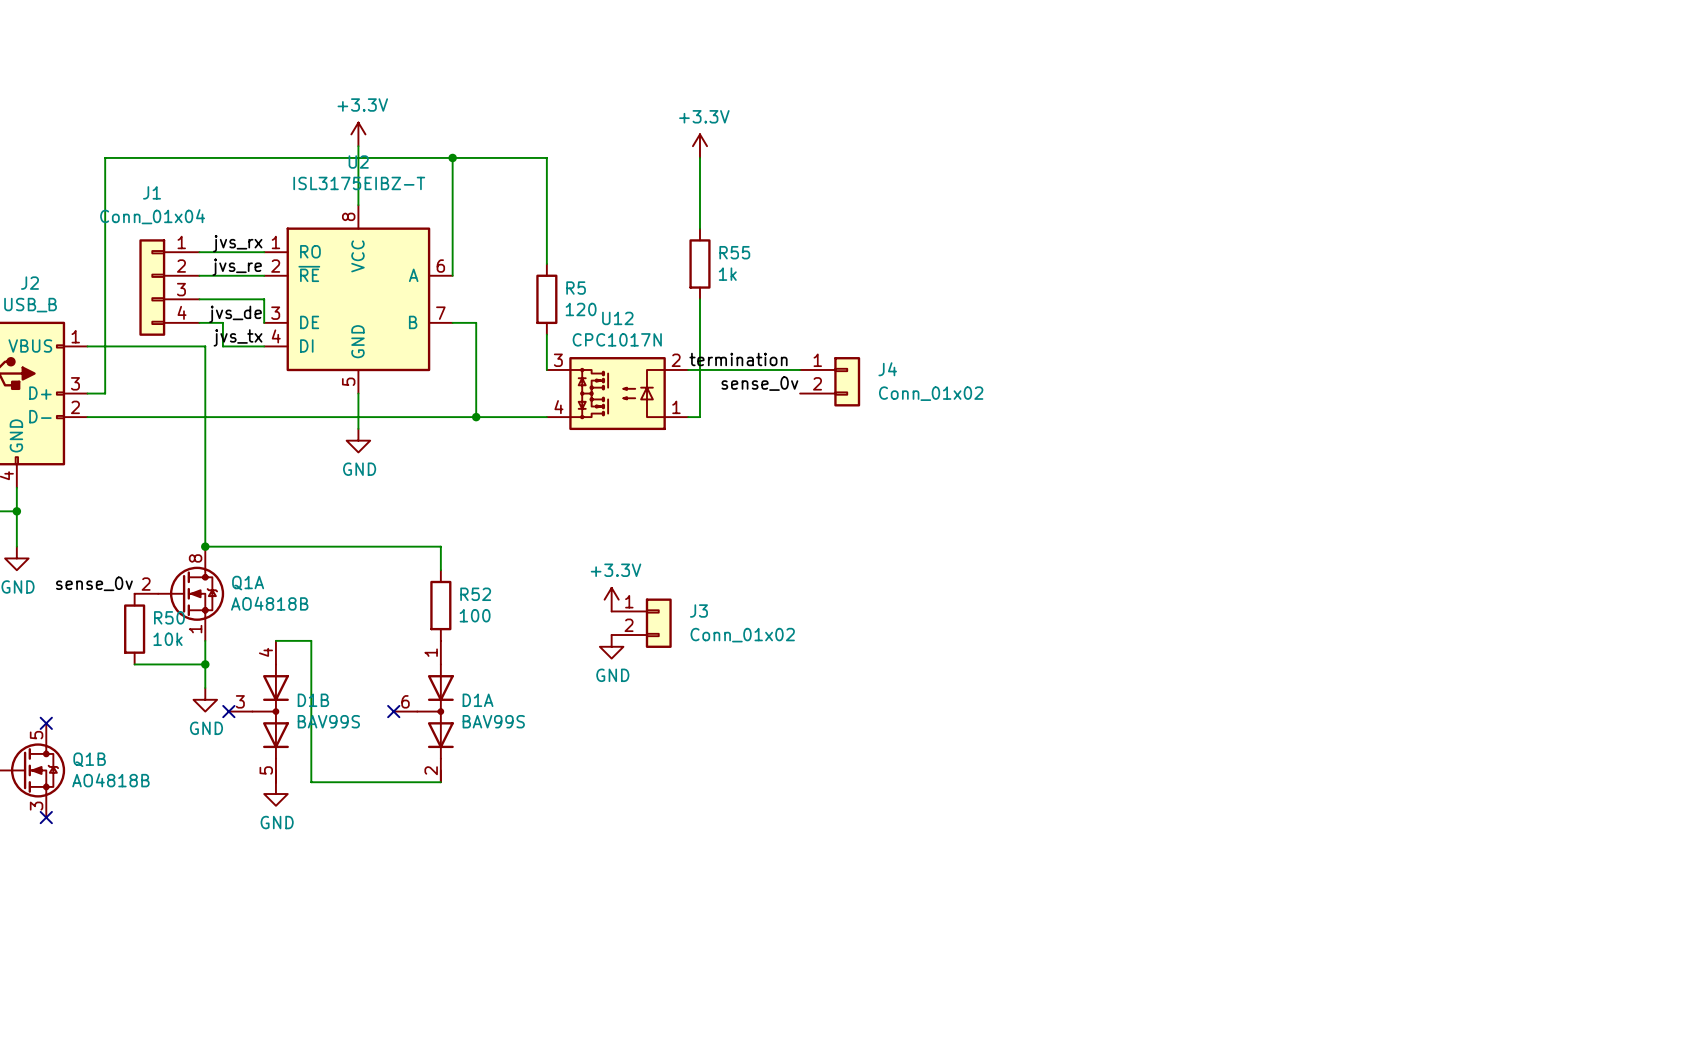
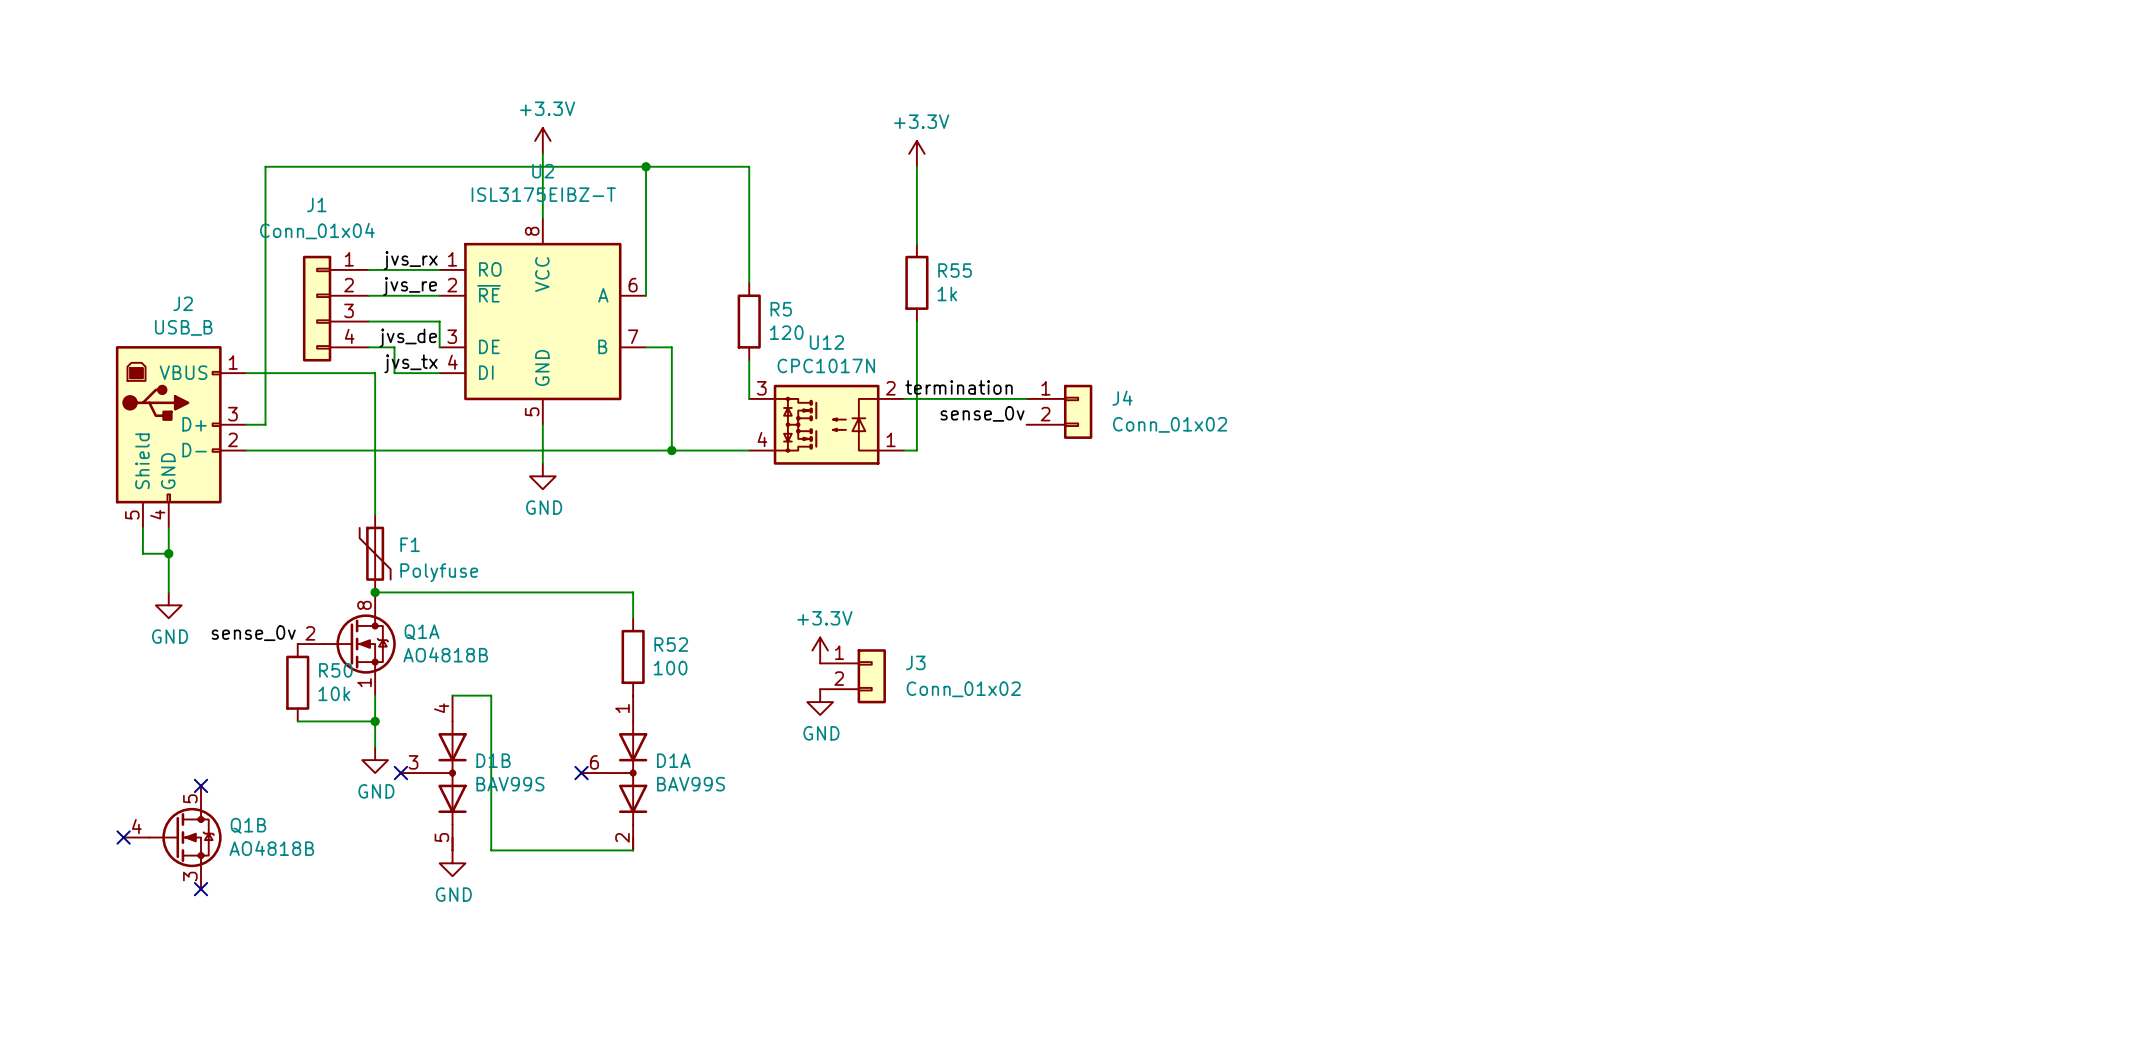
F1: none -> Polyfuse (375, 553)

